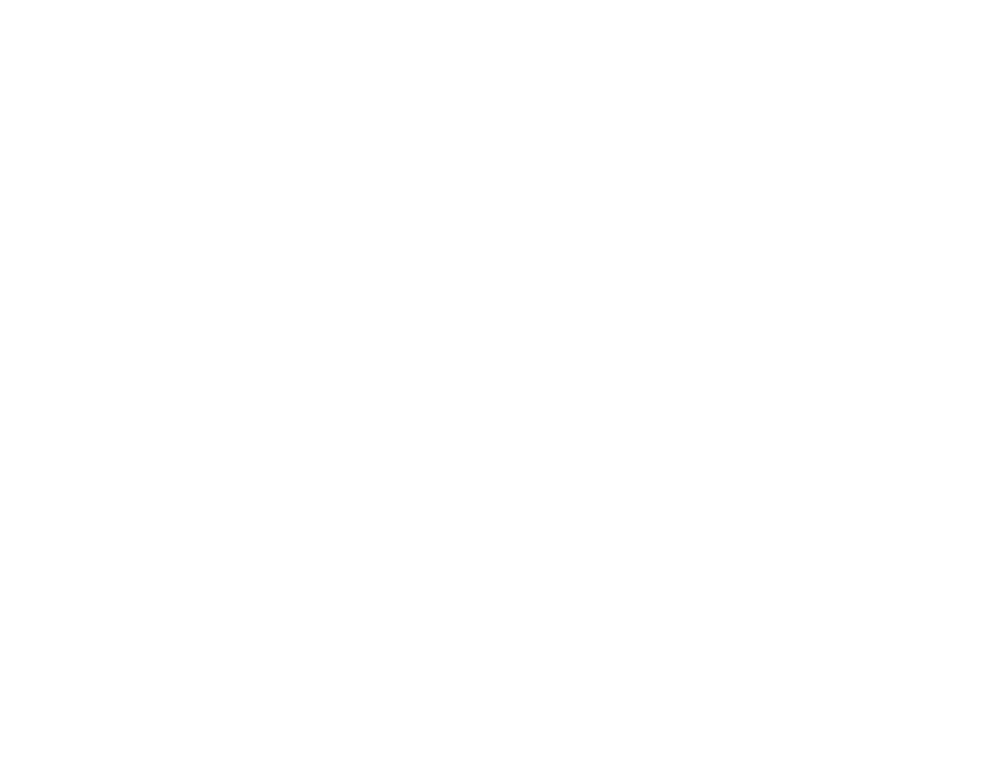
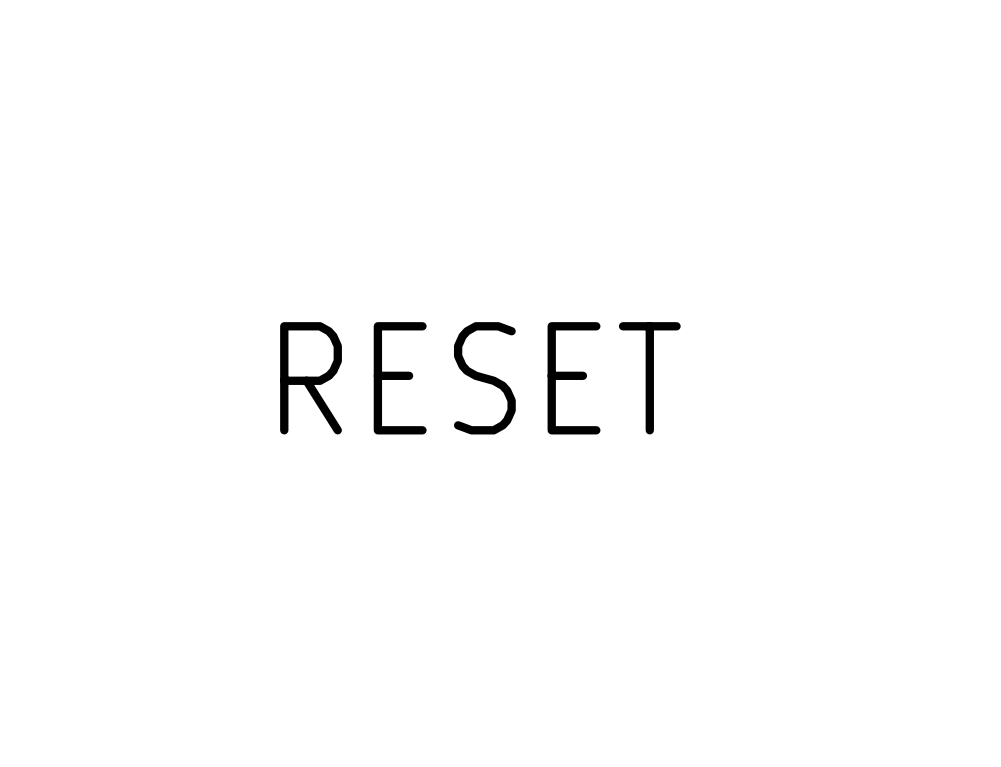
text: none -> RESET (480, 378)

